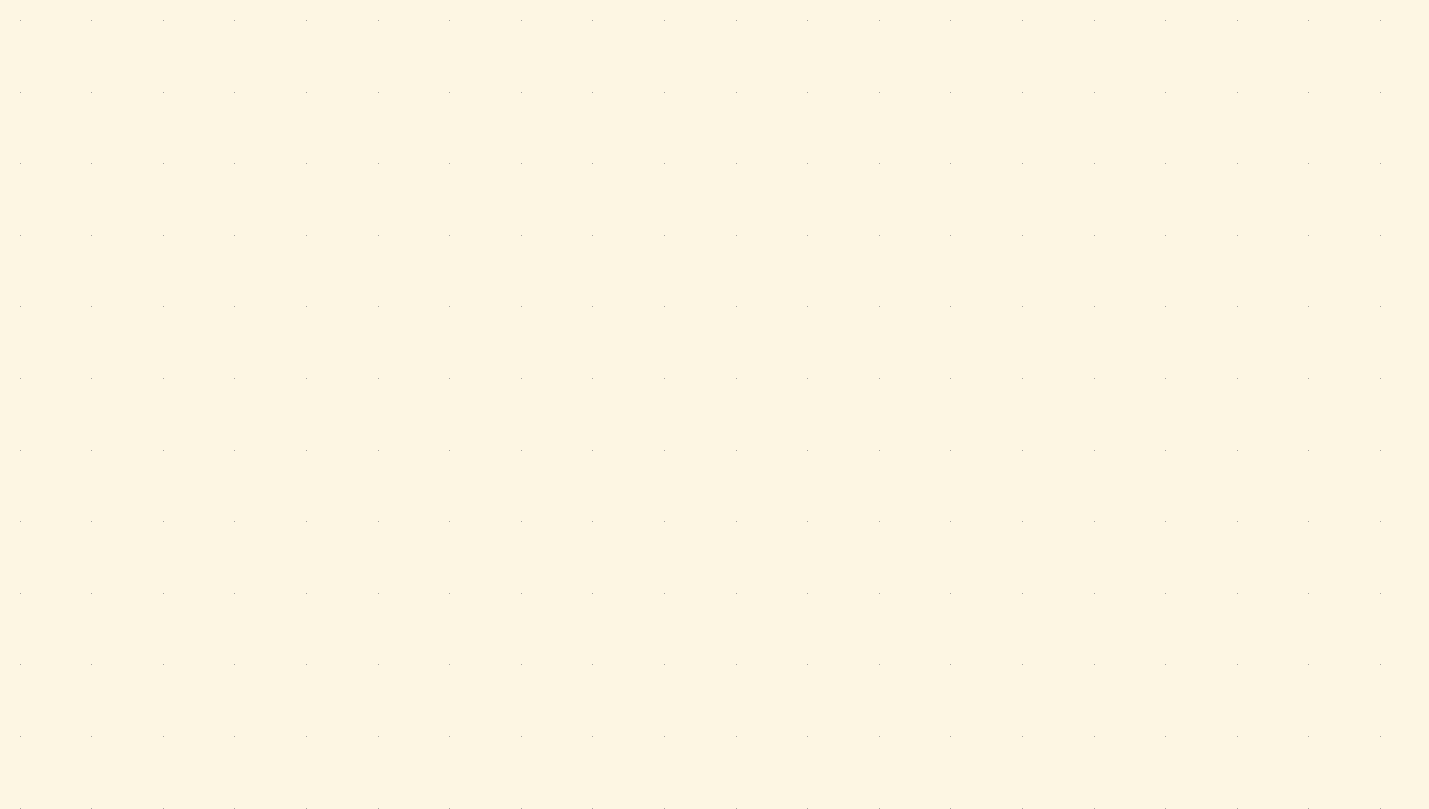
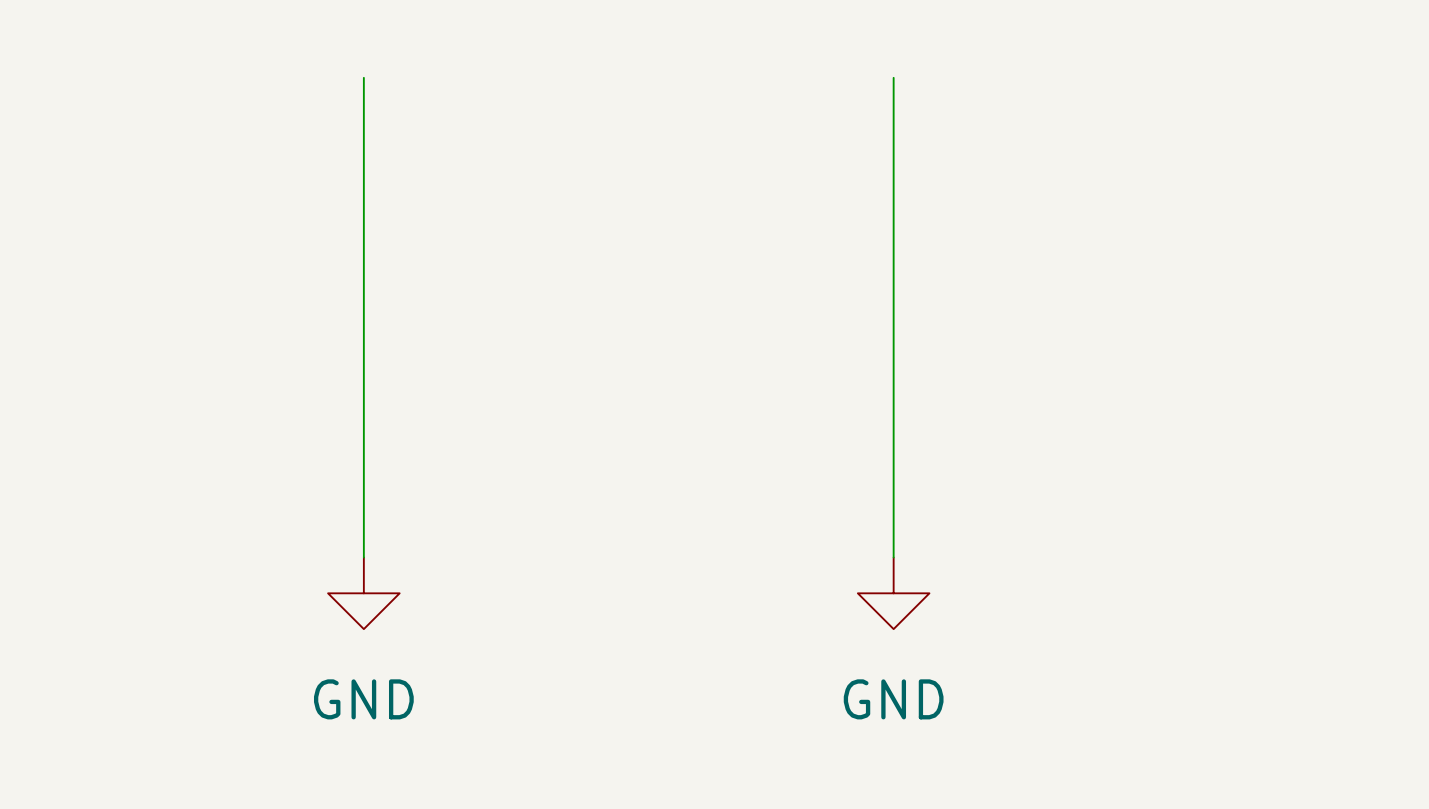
wire: none -> (363, 77) (363, 557)
wire: none -> (893, 77) (893, 557)
power symbol: none -> GND (363, 593)
power symbol: none -> GND (893, 593)

